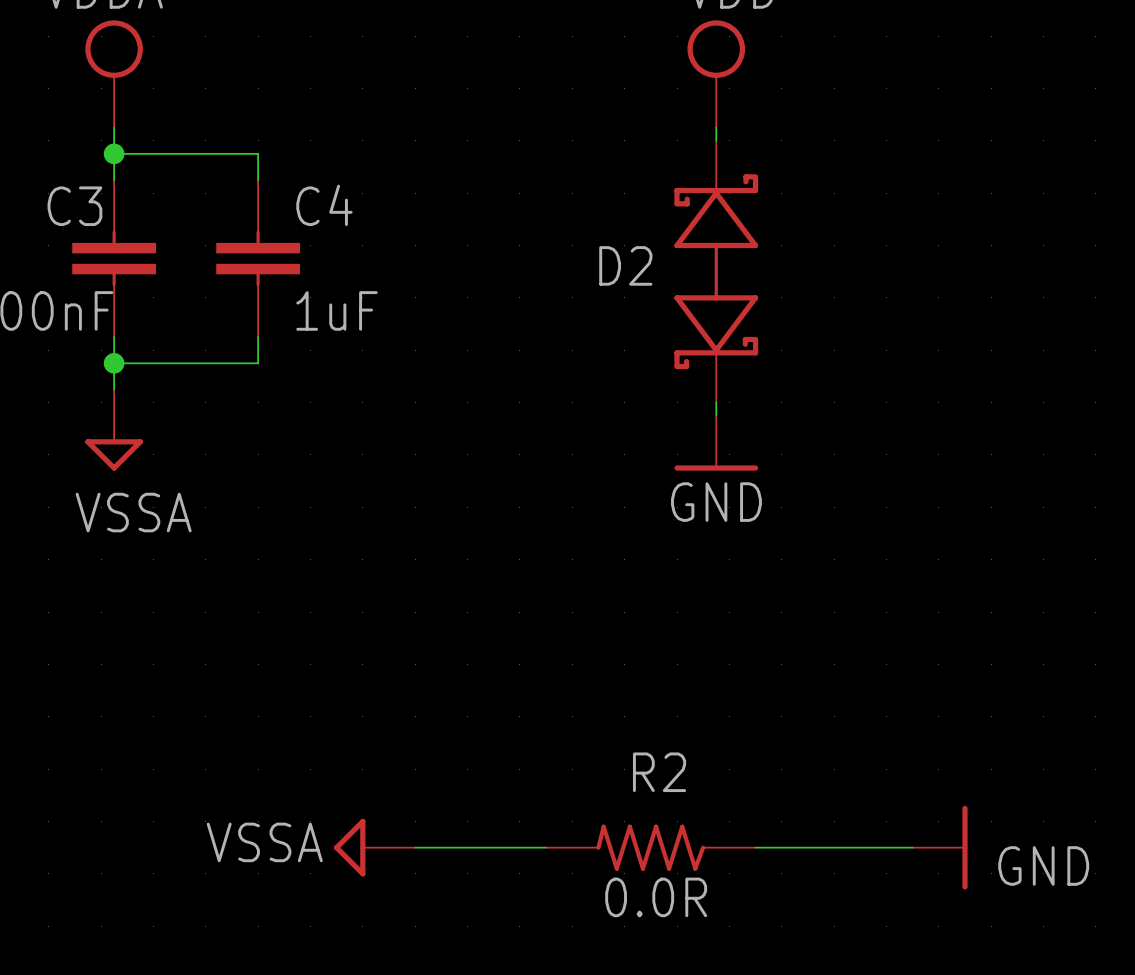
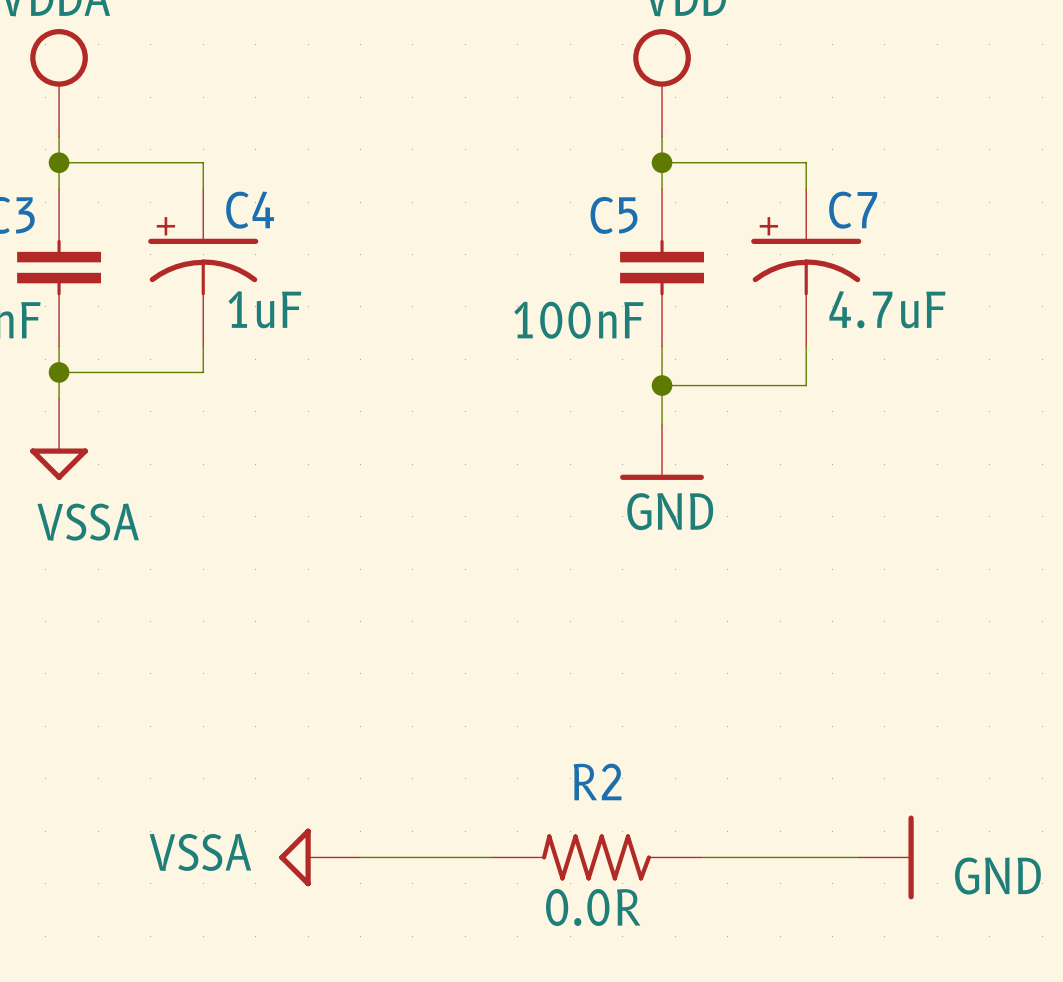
wire: none -> (662, 162) (806, 162) (806, 188)
junction: none -> (662, 162)
C4 symbol: [216, 180, 300, 338] -> [148, 188, 259, 347]
C5: none -> 100nF (662, 267)
C7: none -> 4.7uF (806, 267)
D2: (716, 271) -> none
wire: none -> (806, 346) (806, 385) (662, 385)
junction: none -> (662, 385)

